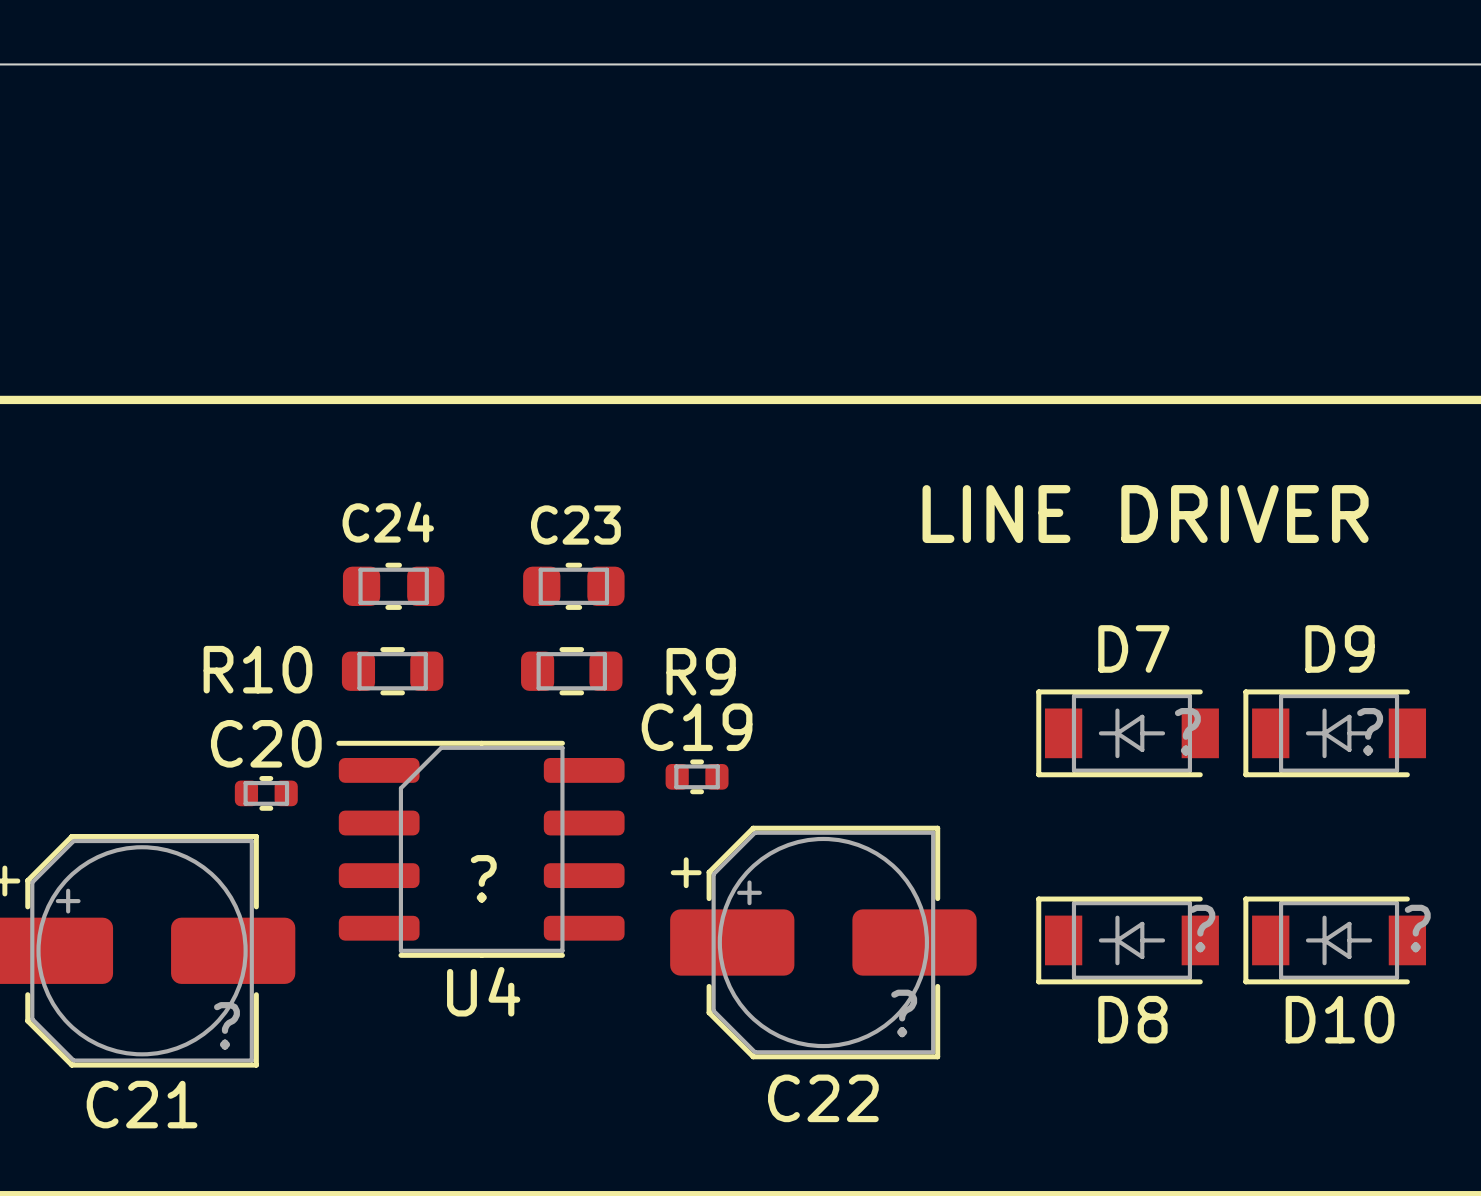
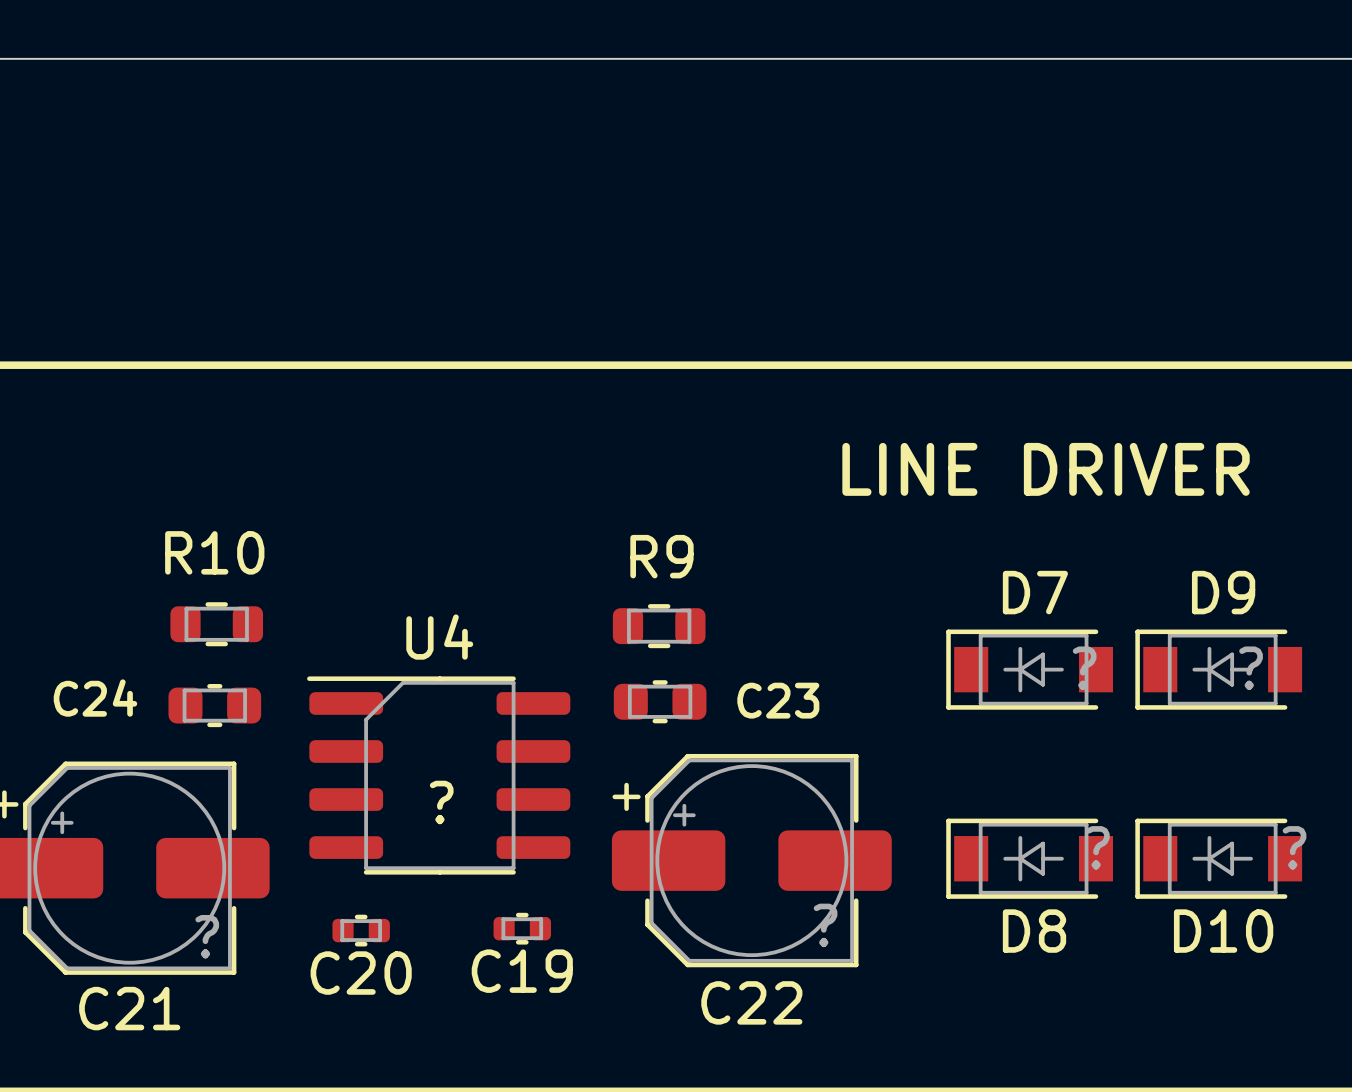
C24 name position: C24 (388, 522) -> C24 (95, 698)
C23 name position: C23 (575, 525) -> C23 (778, 700)
C24 position: (393, 586) -> (214, 705)
C23 position: (573, 586) -> (660, 701)
R10 name position: R10 (257, 669) -> R10 (214, 552)
R10 position: (392, 671) -> (216, 624)
R9 position: (571, 671) -> (659, 626)
R9 name position: R9 (701, 671) -> R9 (661, 556)
C19 name position: C19 (697, 727) -> C19 (522, 971)
C20 name position: C20 (266, 743) -> C20 (361, 973)
C19 position: (697, 776) -> (522, 928)
C20 position: (266, 793) -> (361, 930)
U4 name position: U4 (483, 991) -> U4 (439, 637)

